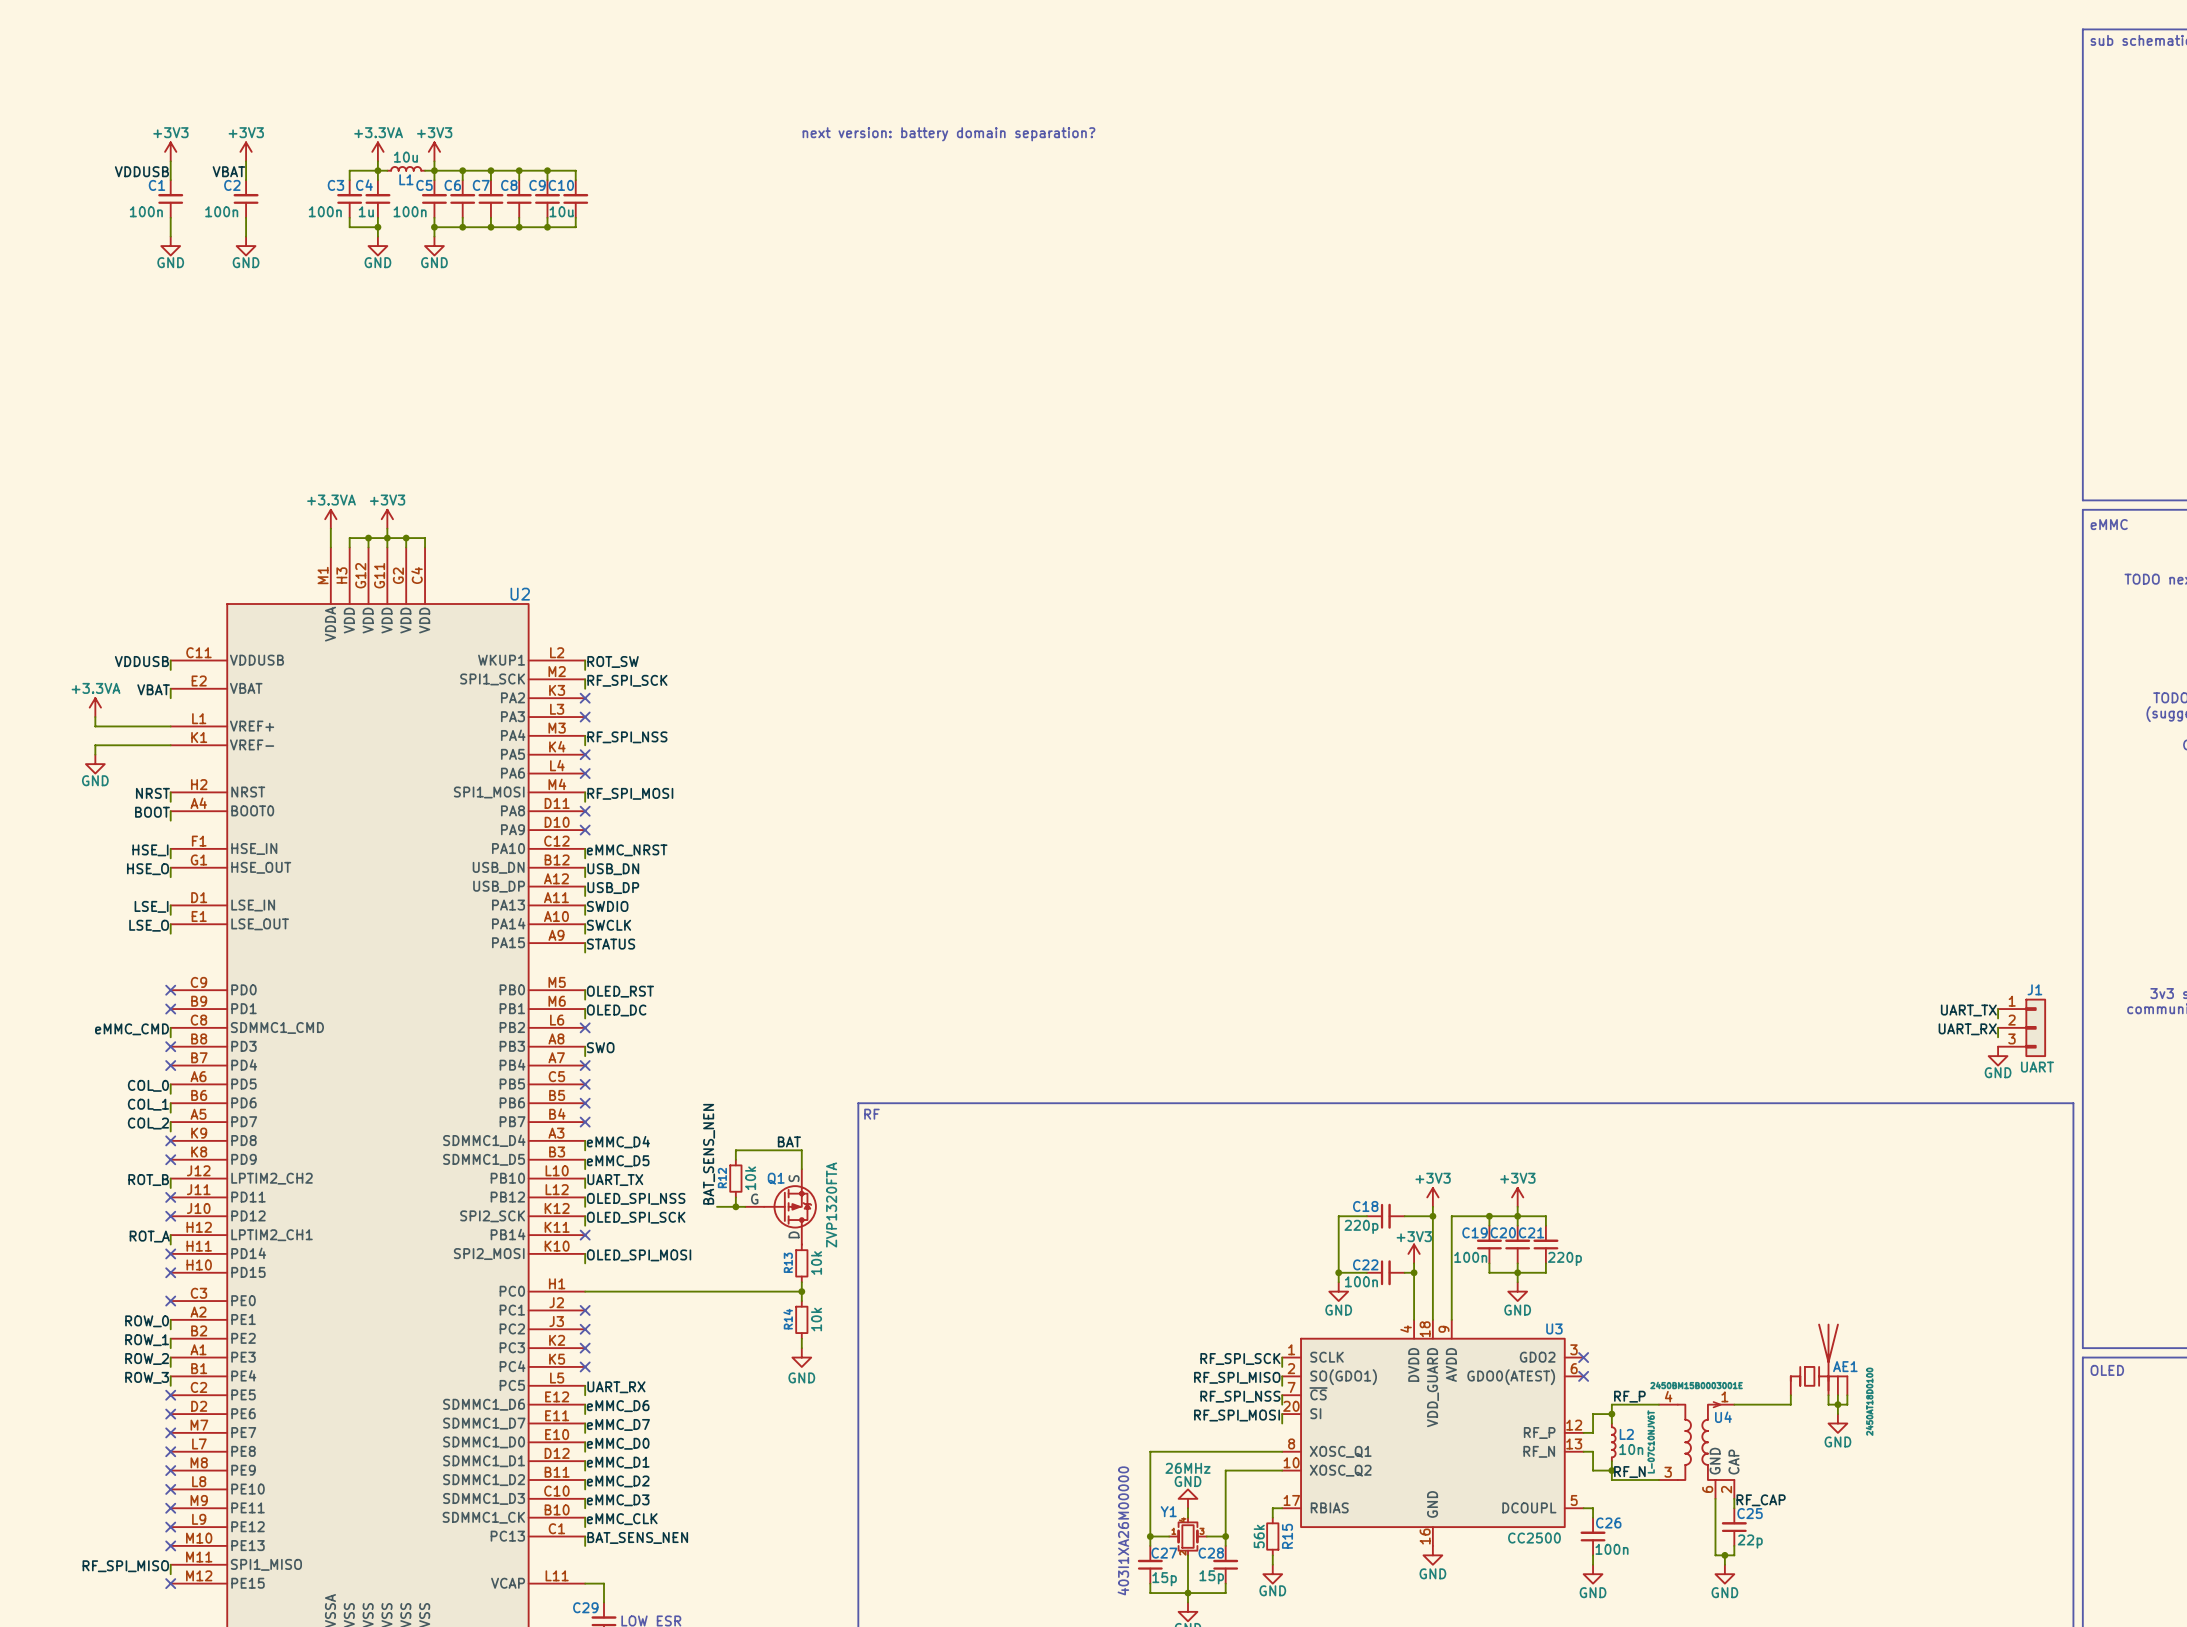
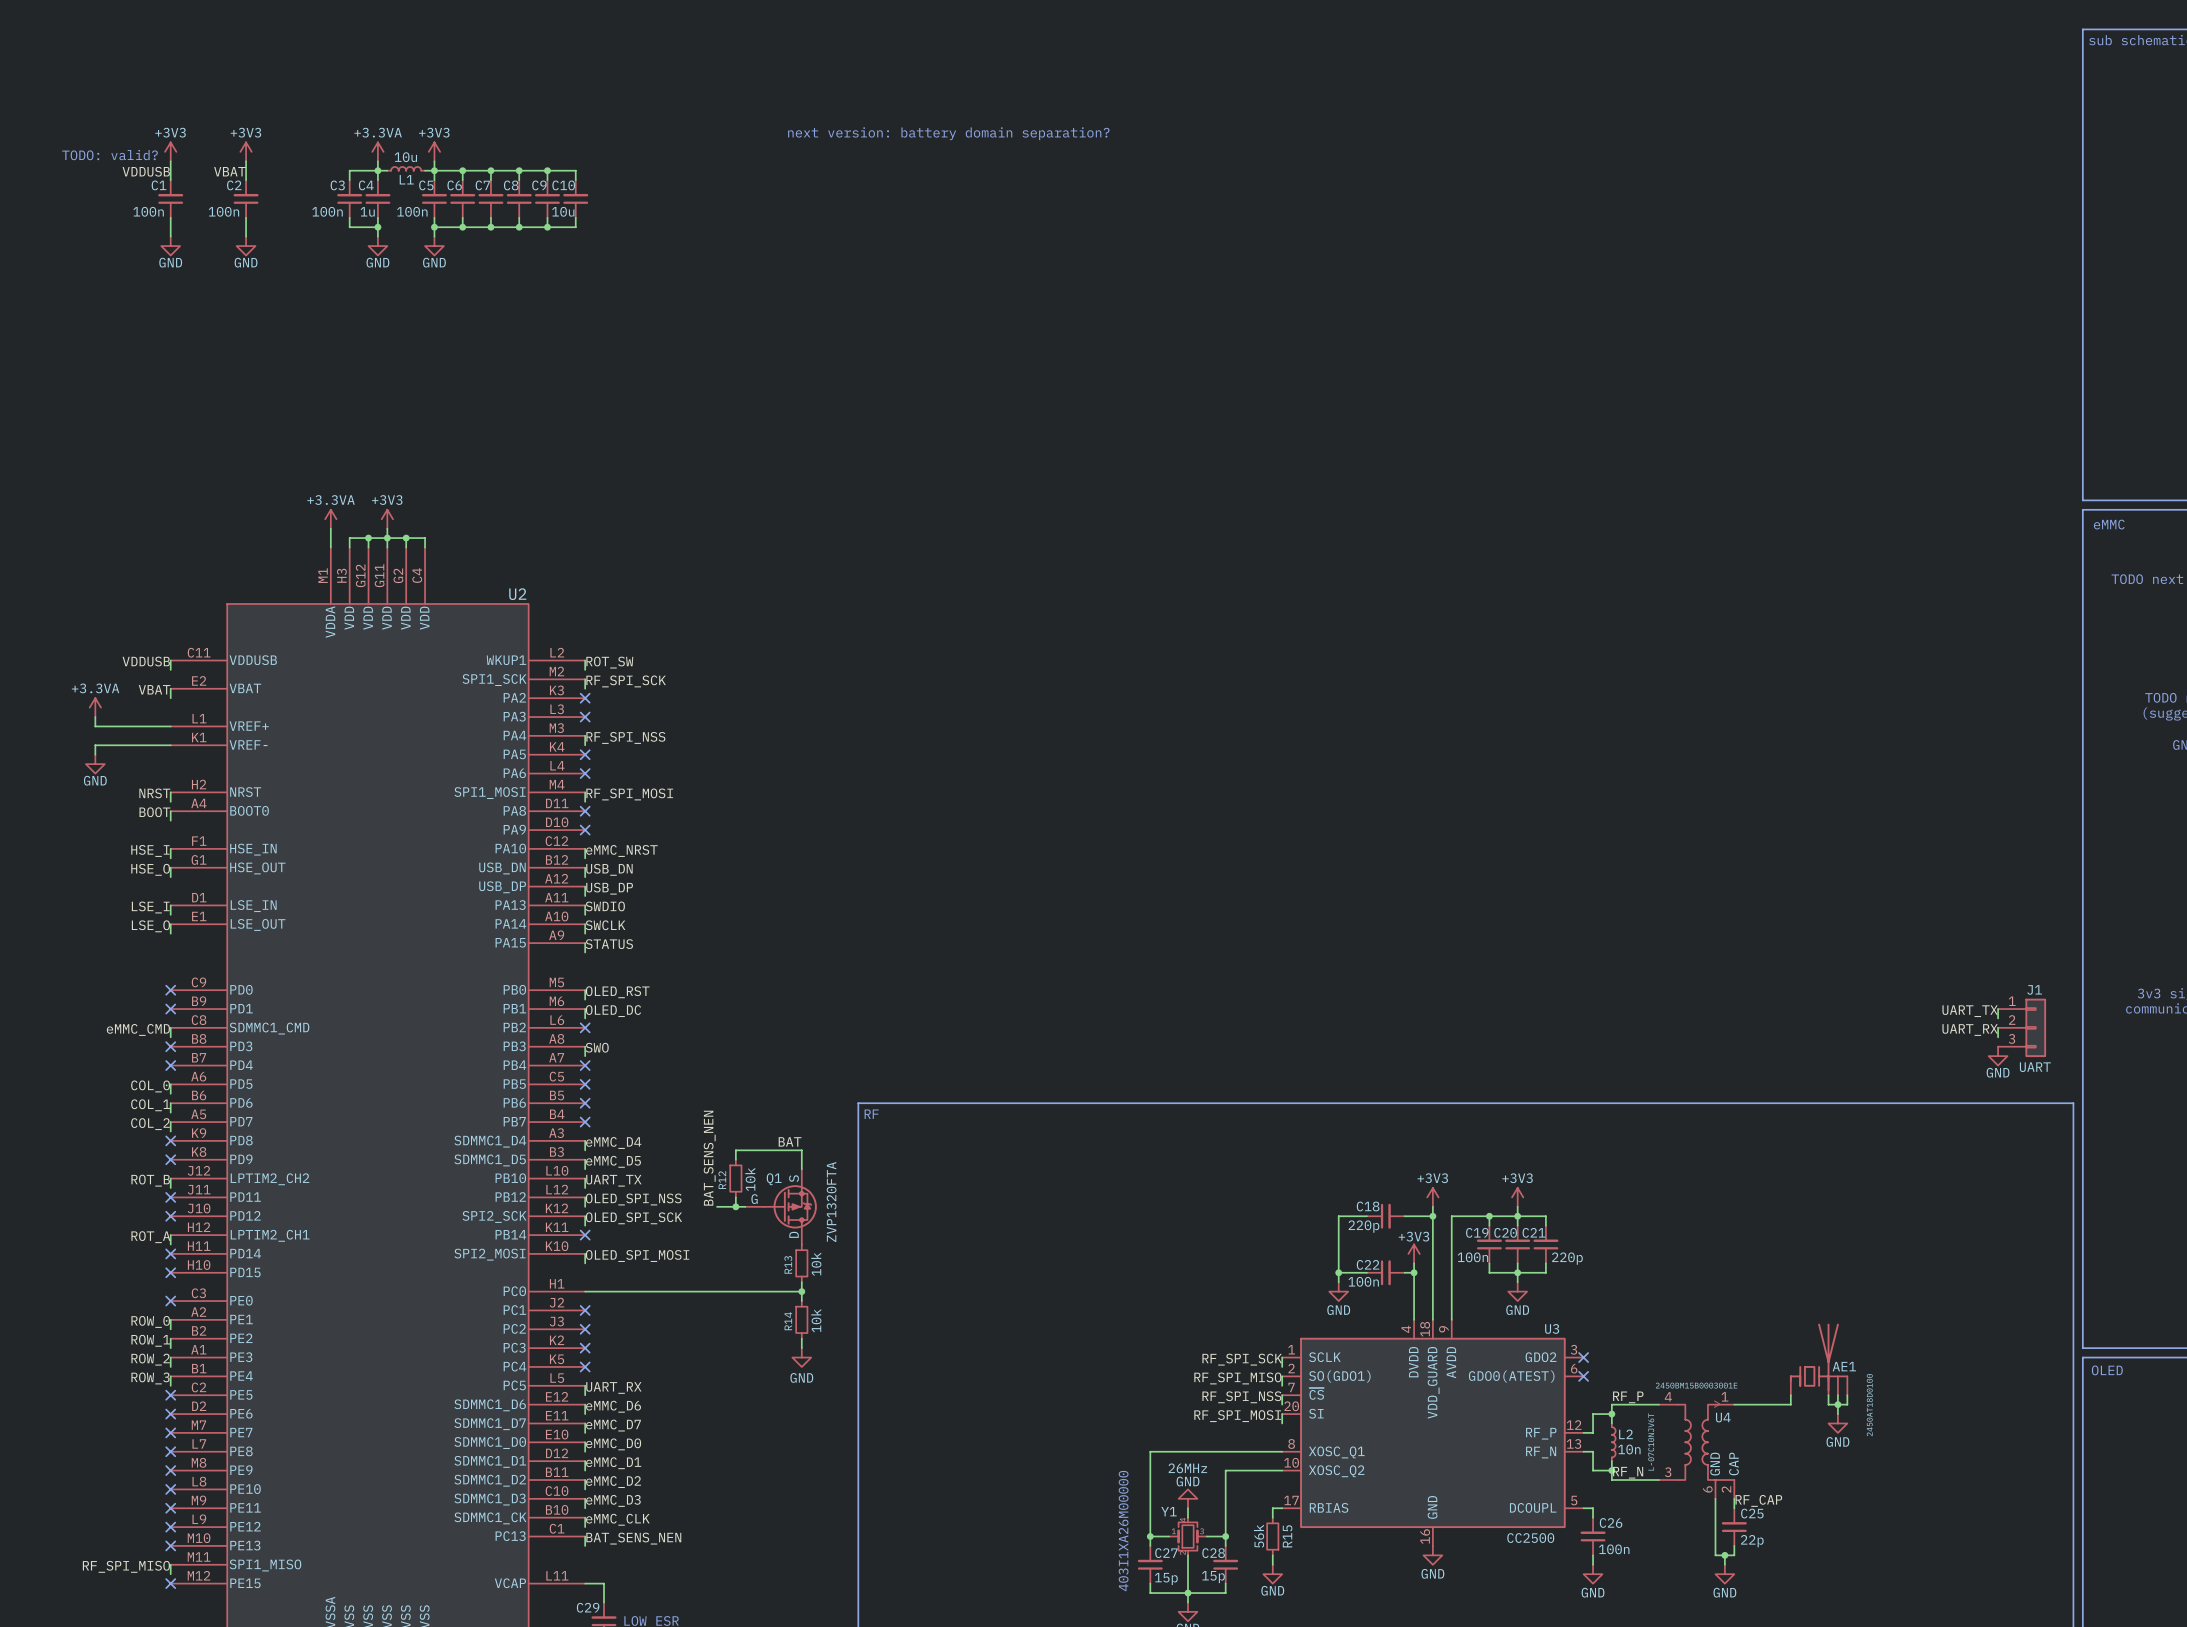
text: none -> TODO: valid? (109, 155)

